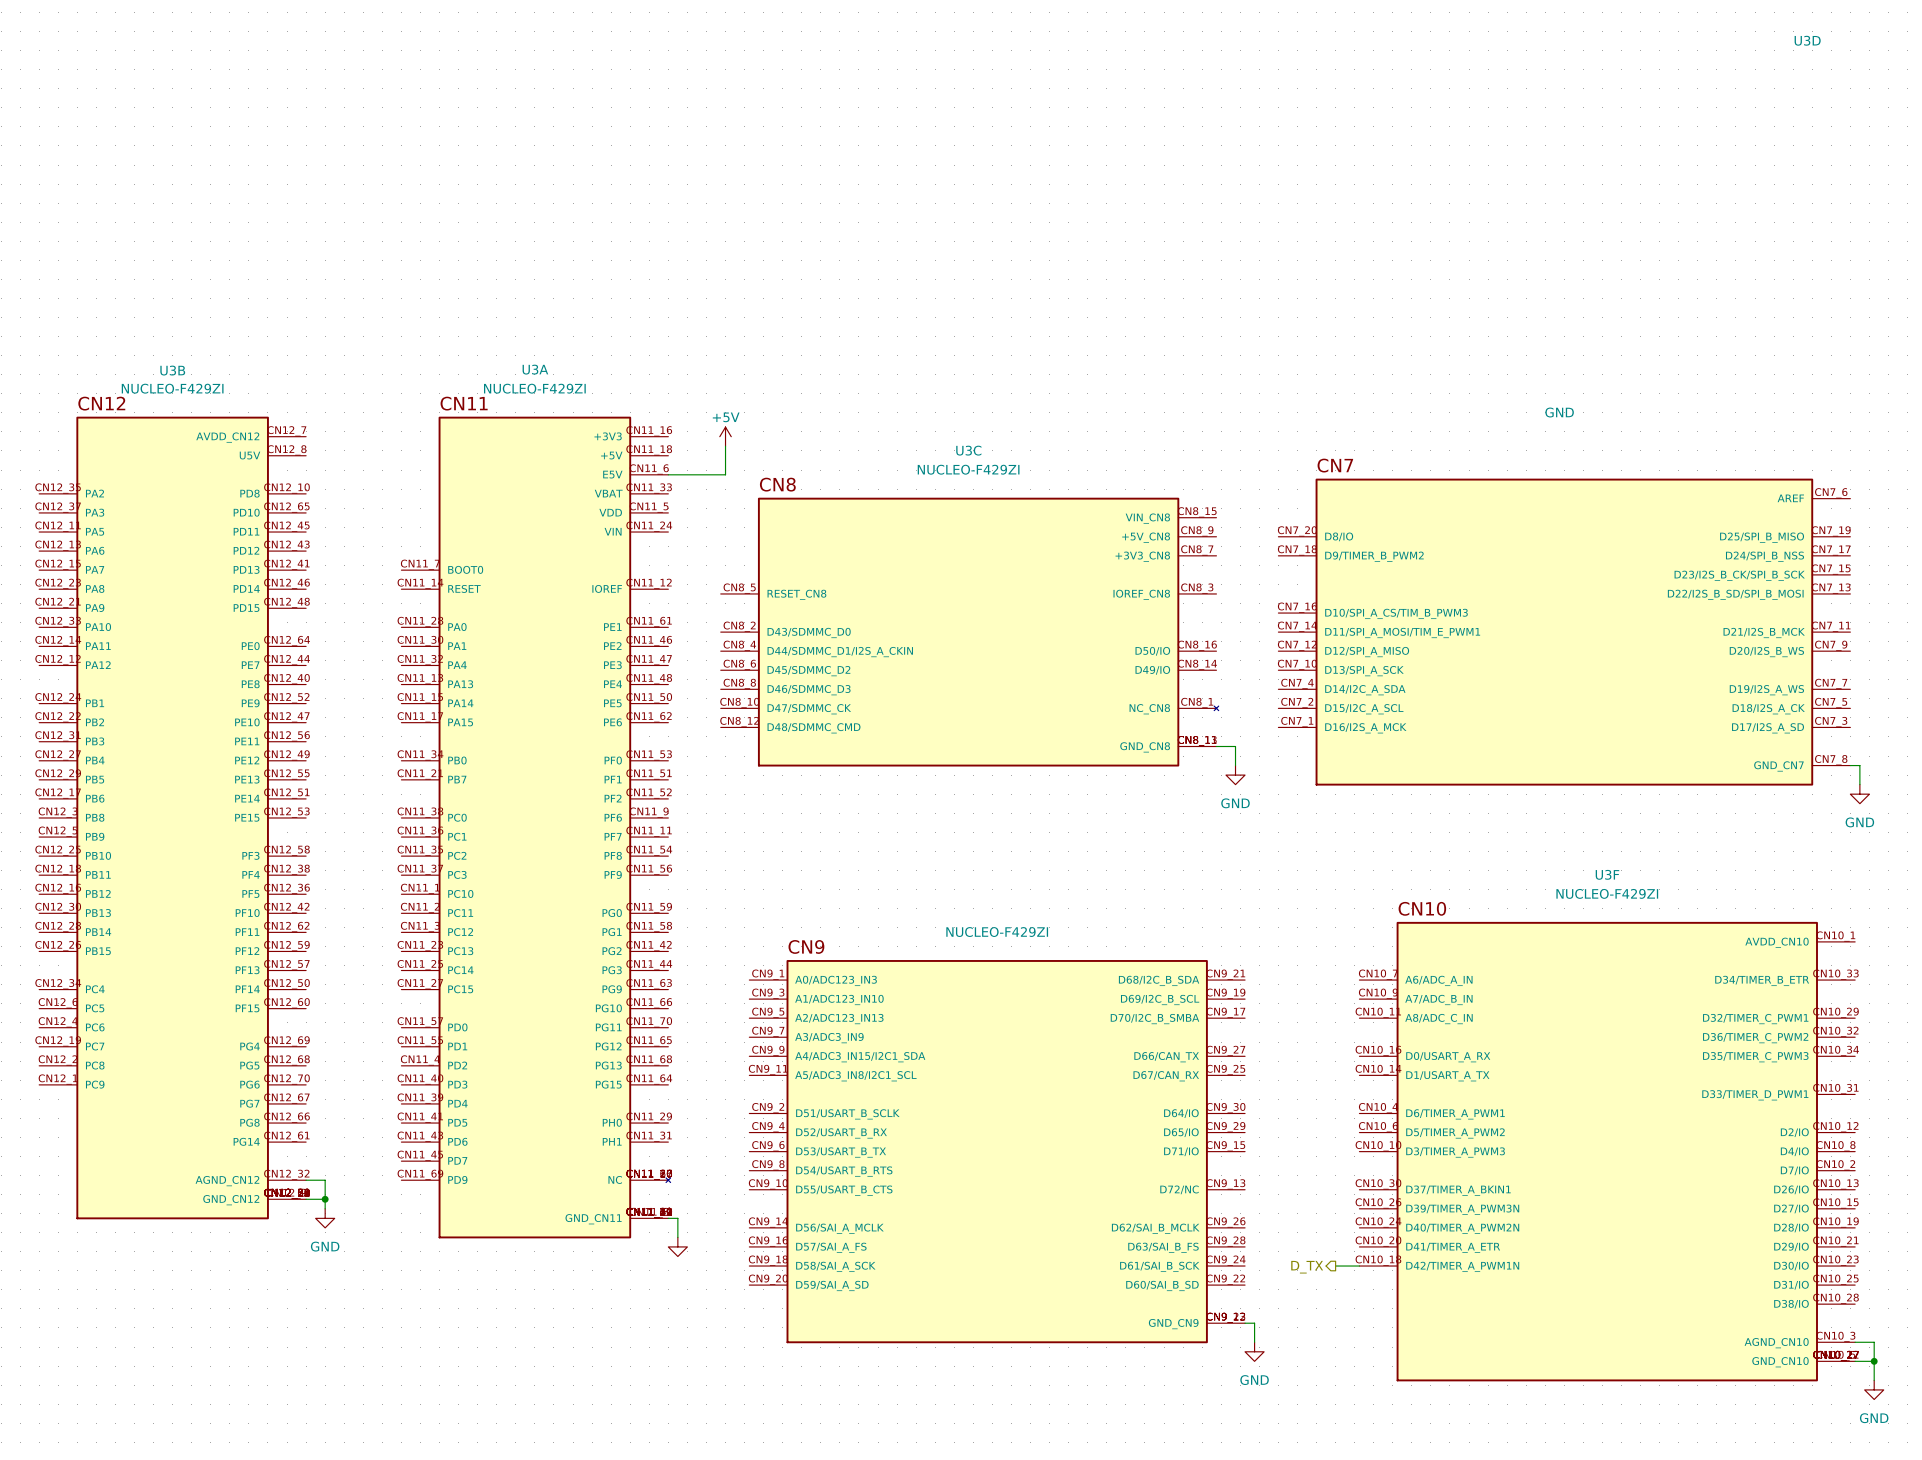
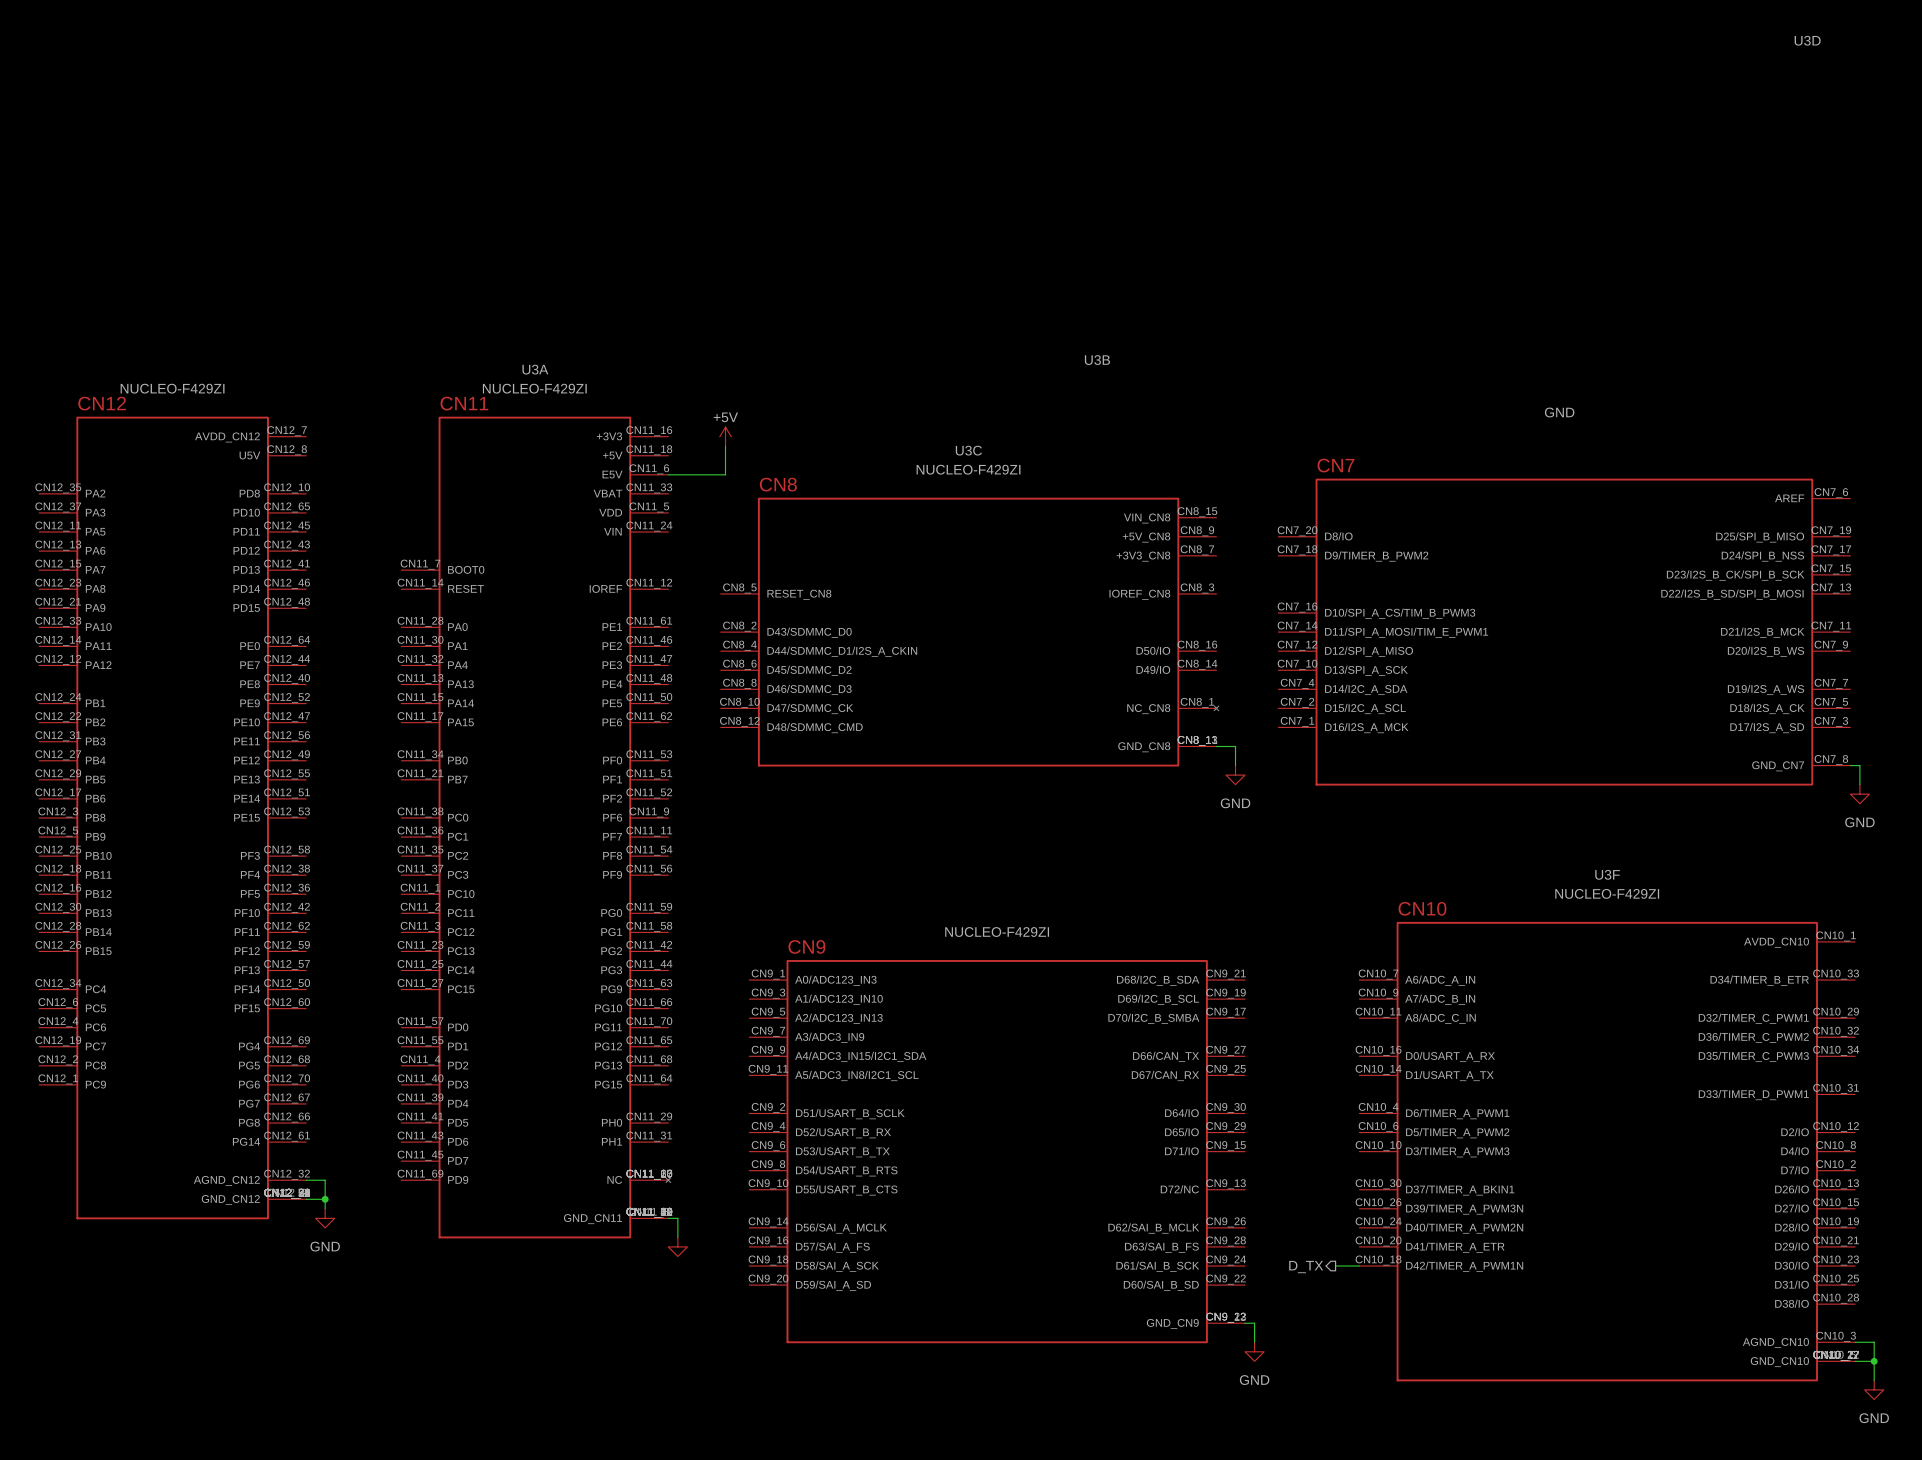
U3B name position: U3B (172, 370) -> U3B (1097, 360)

